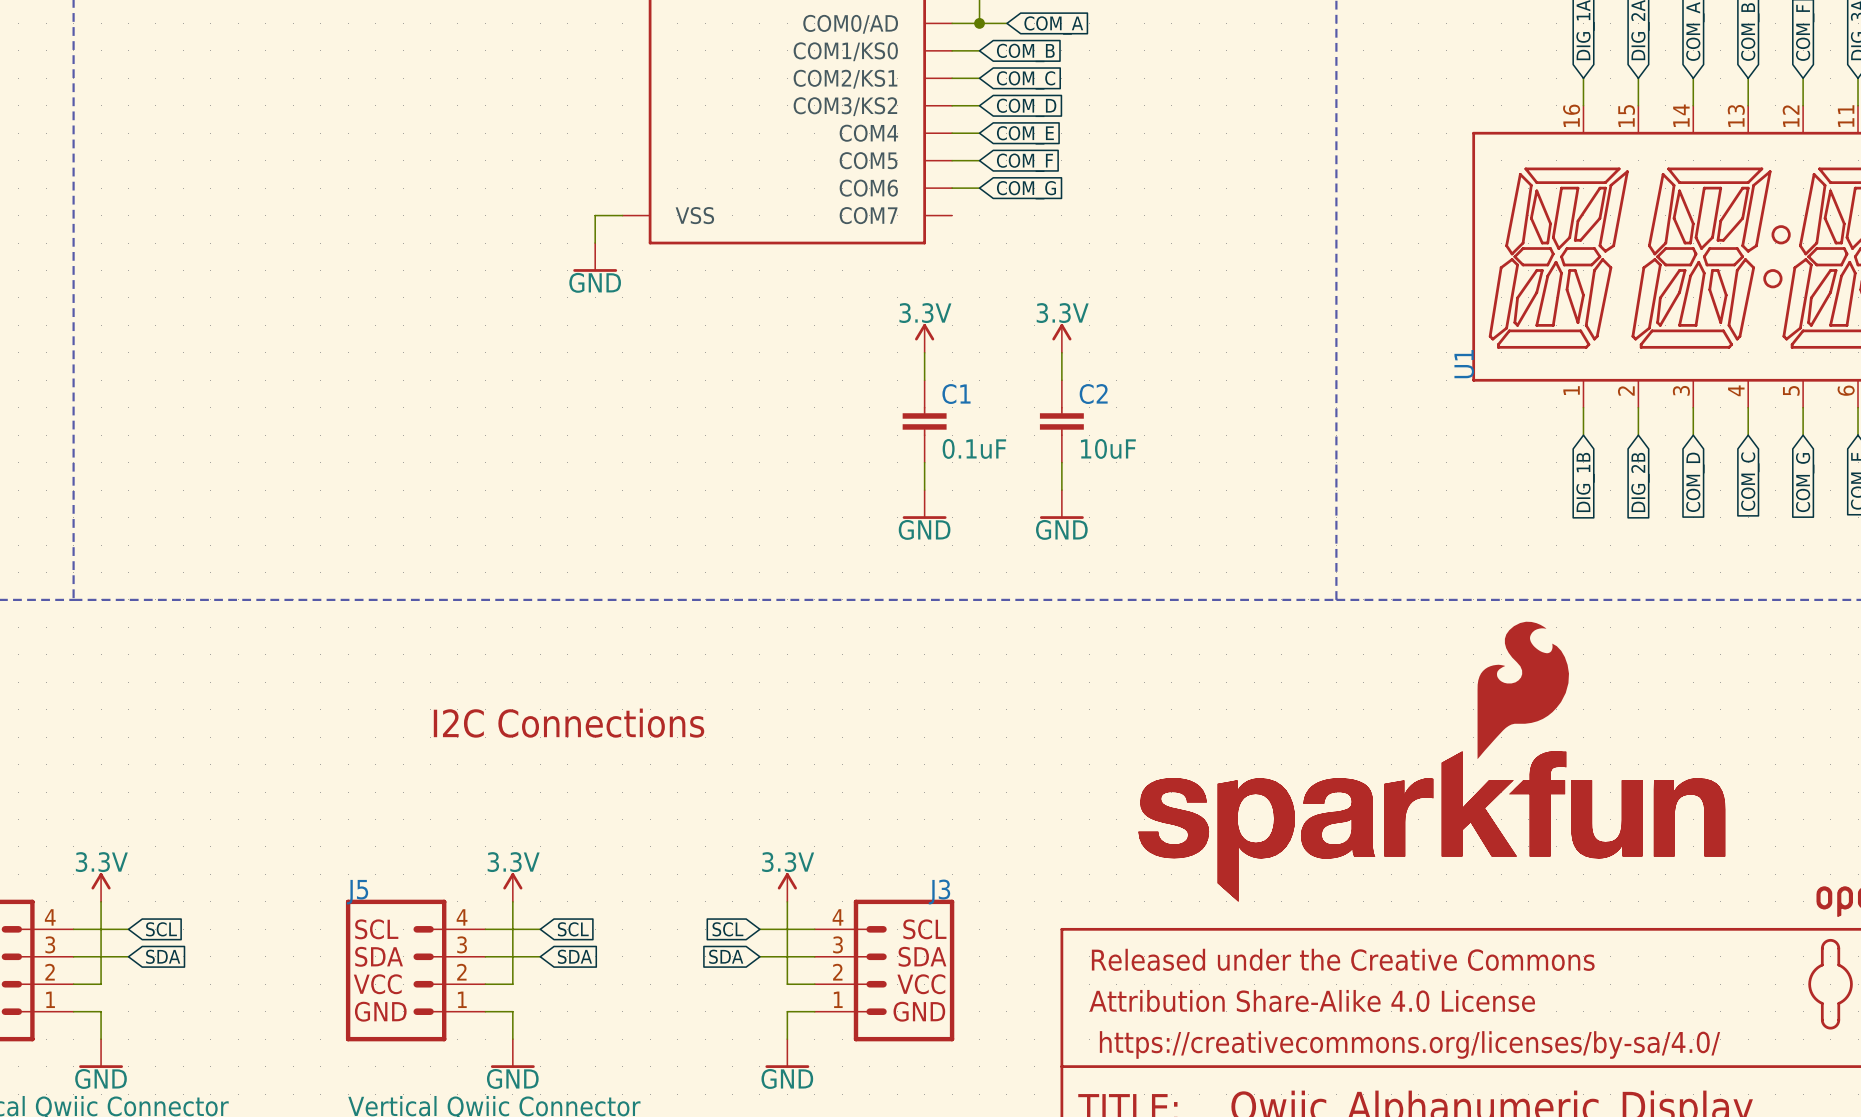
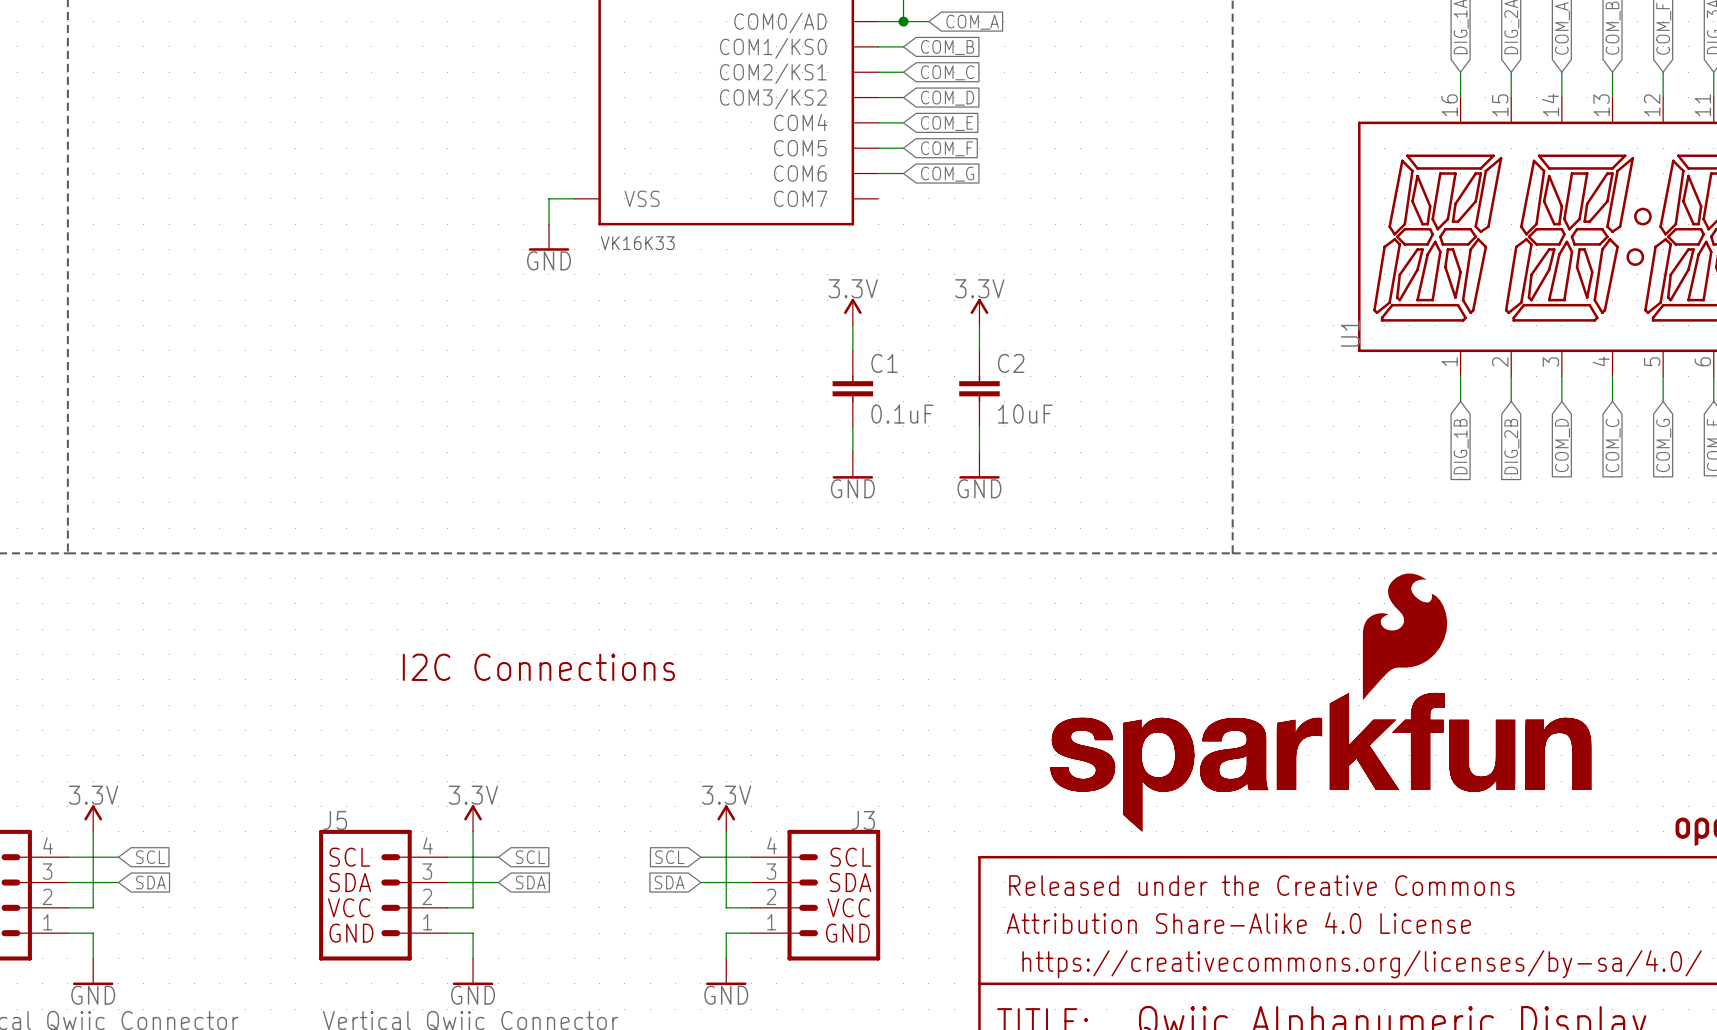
text: none -> VK16K33 (637, 243)
part: (1830, 984) -> none

